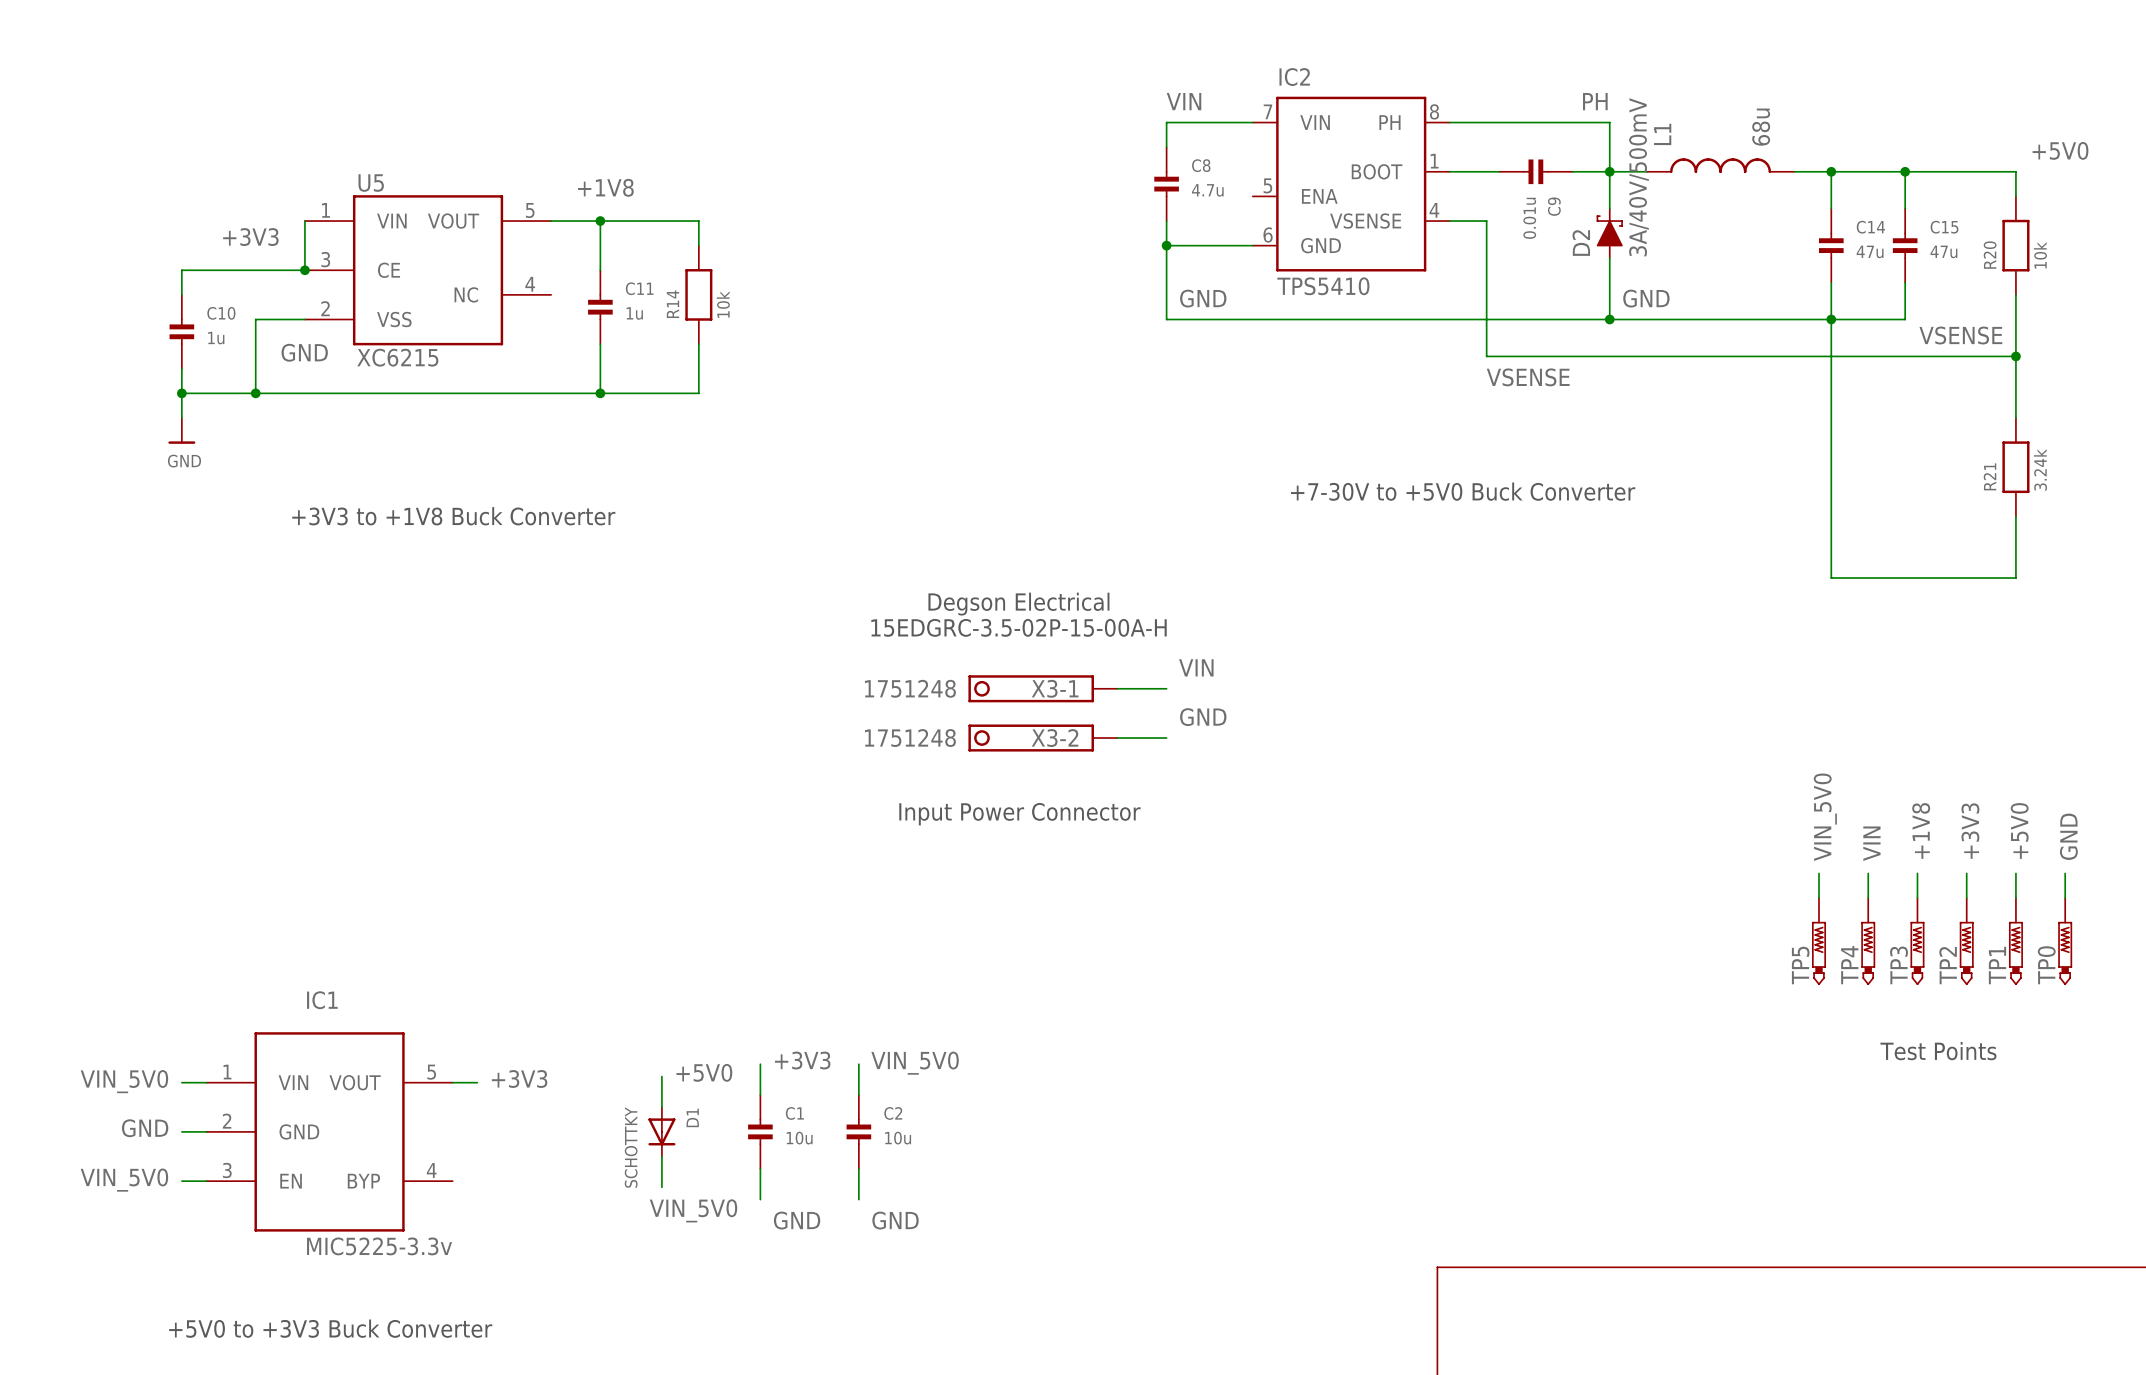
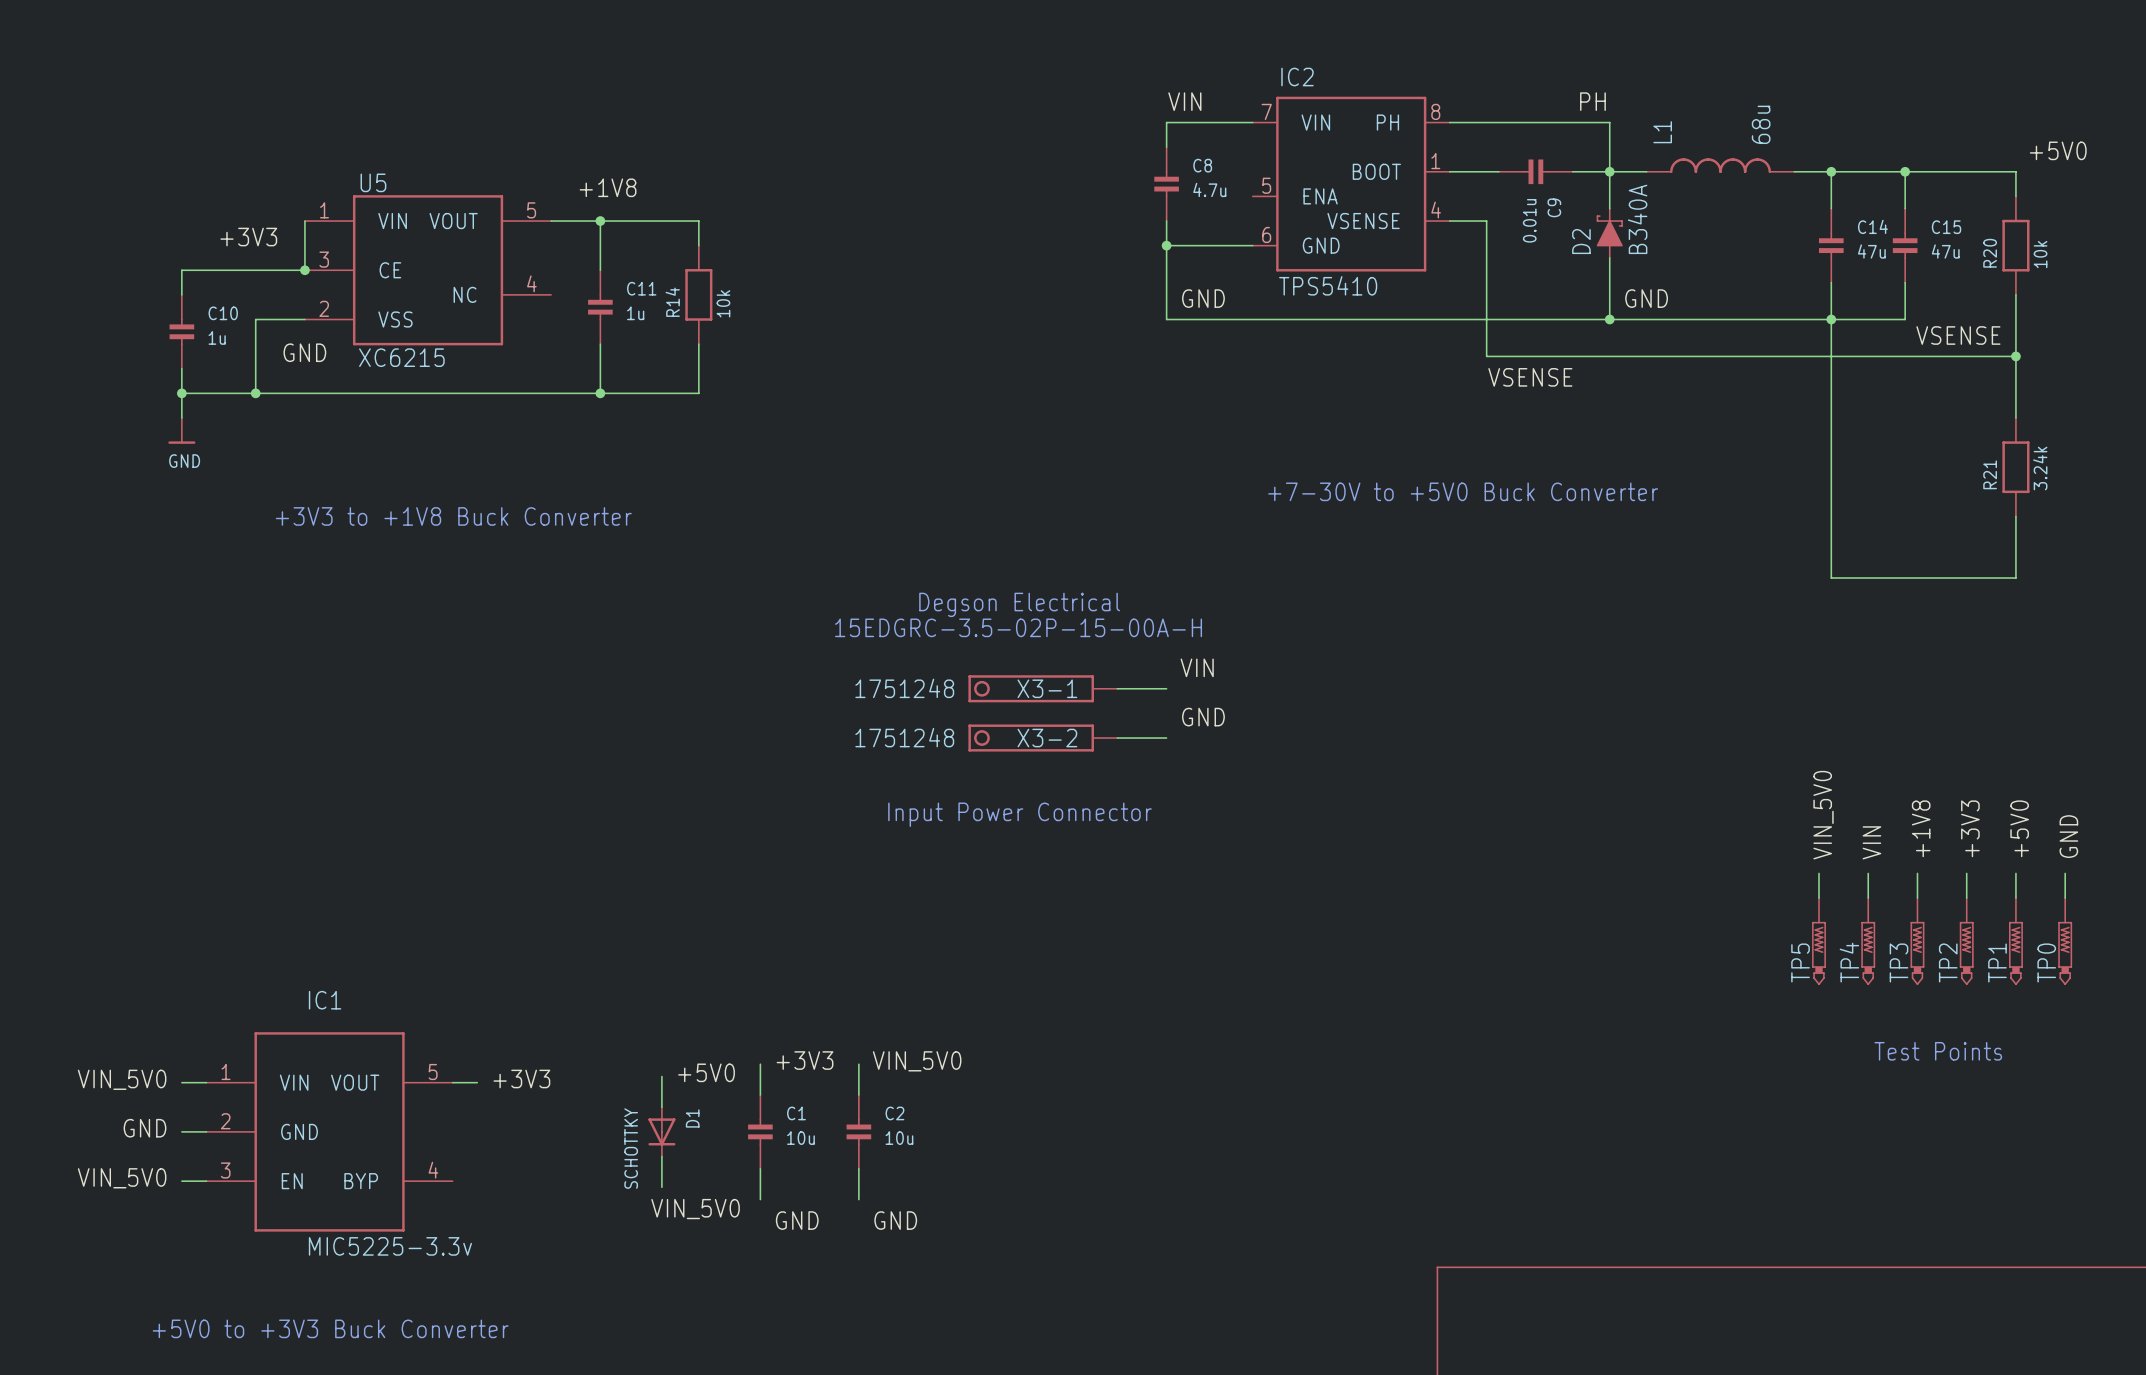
D2 value: 3A/40V/500mV (1638, 177) -> B340A (1637, 219)

